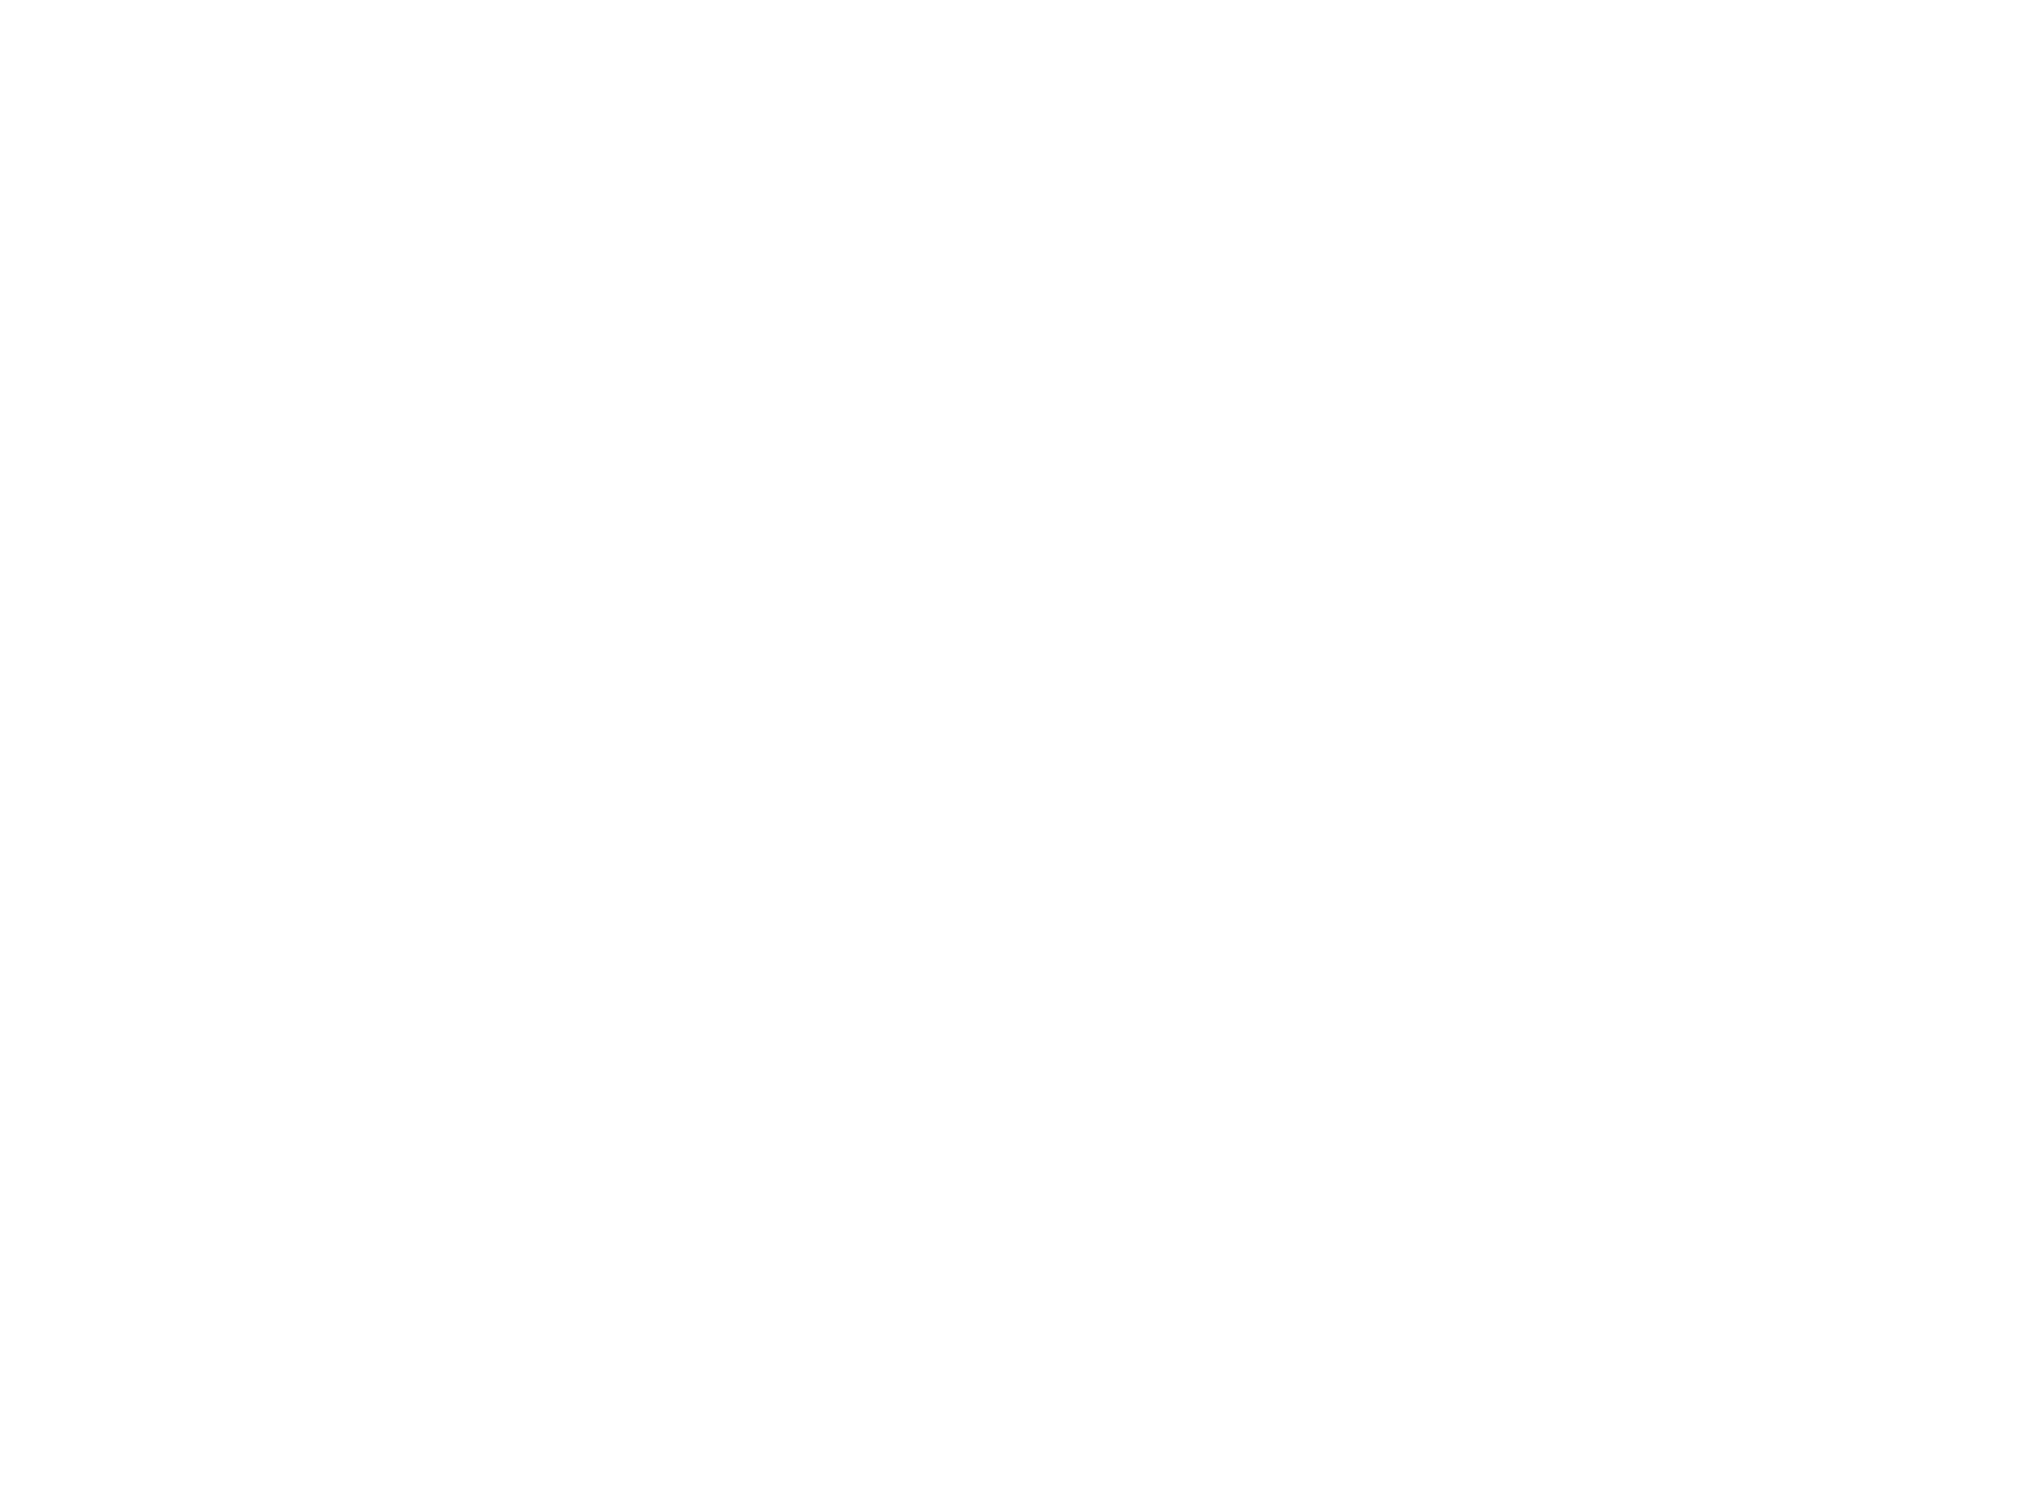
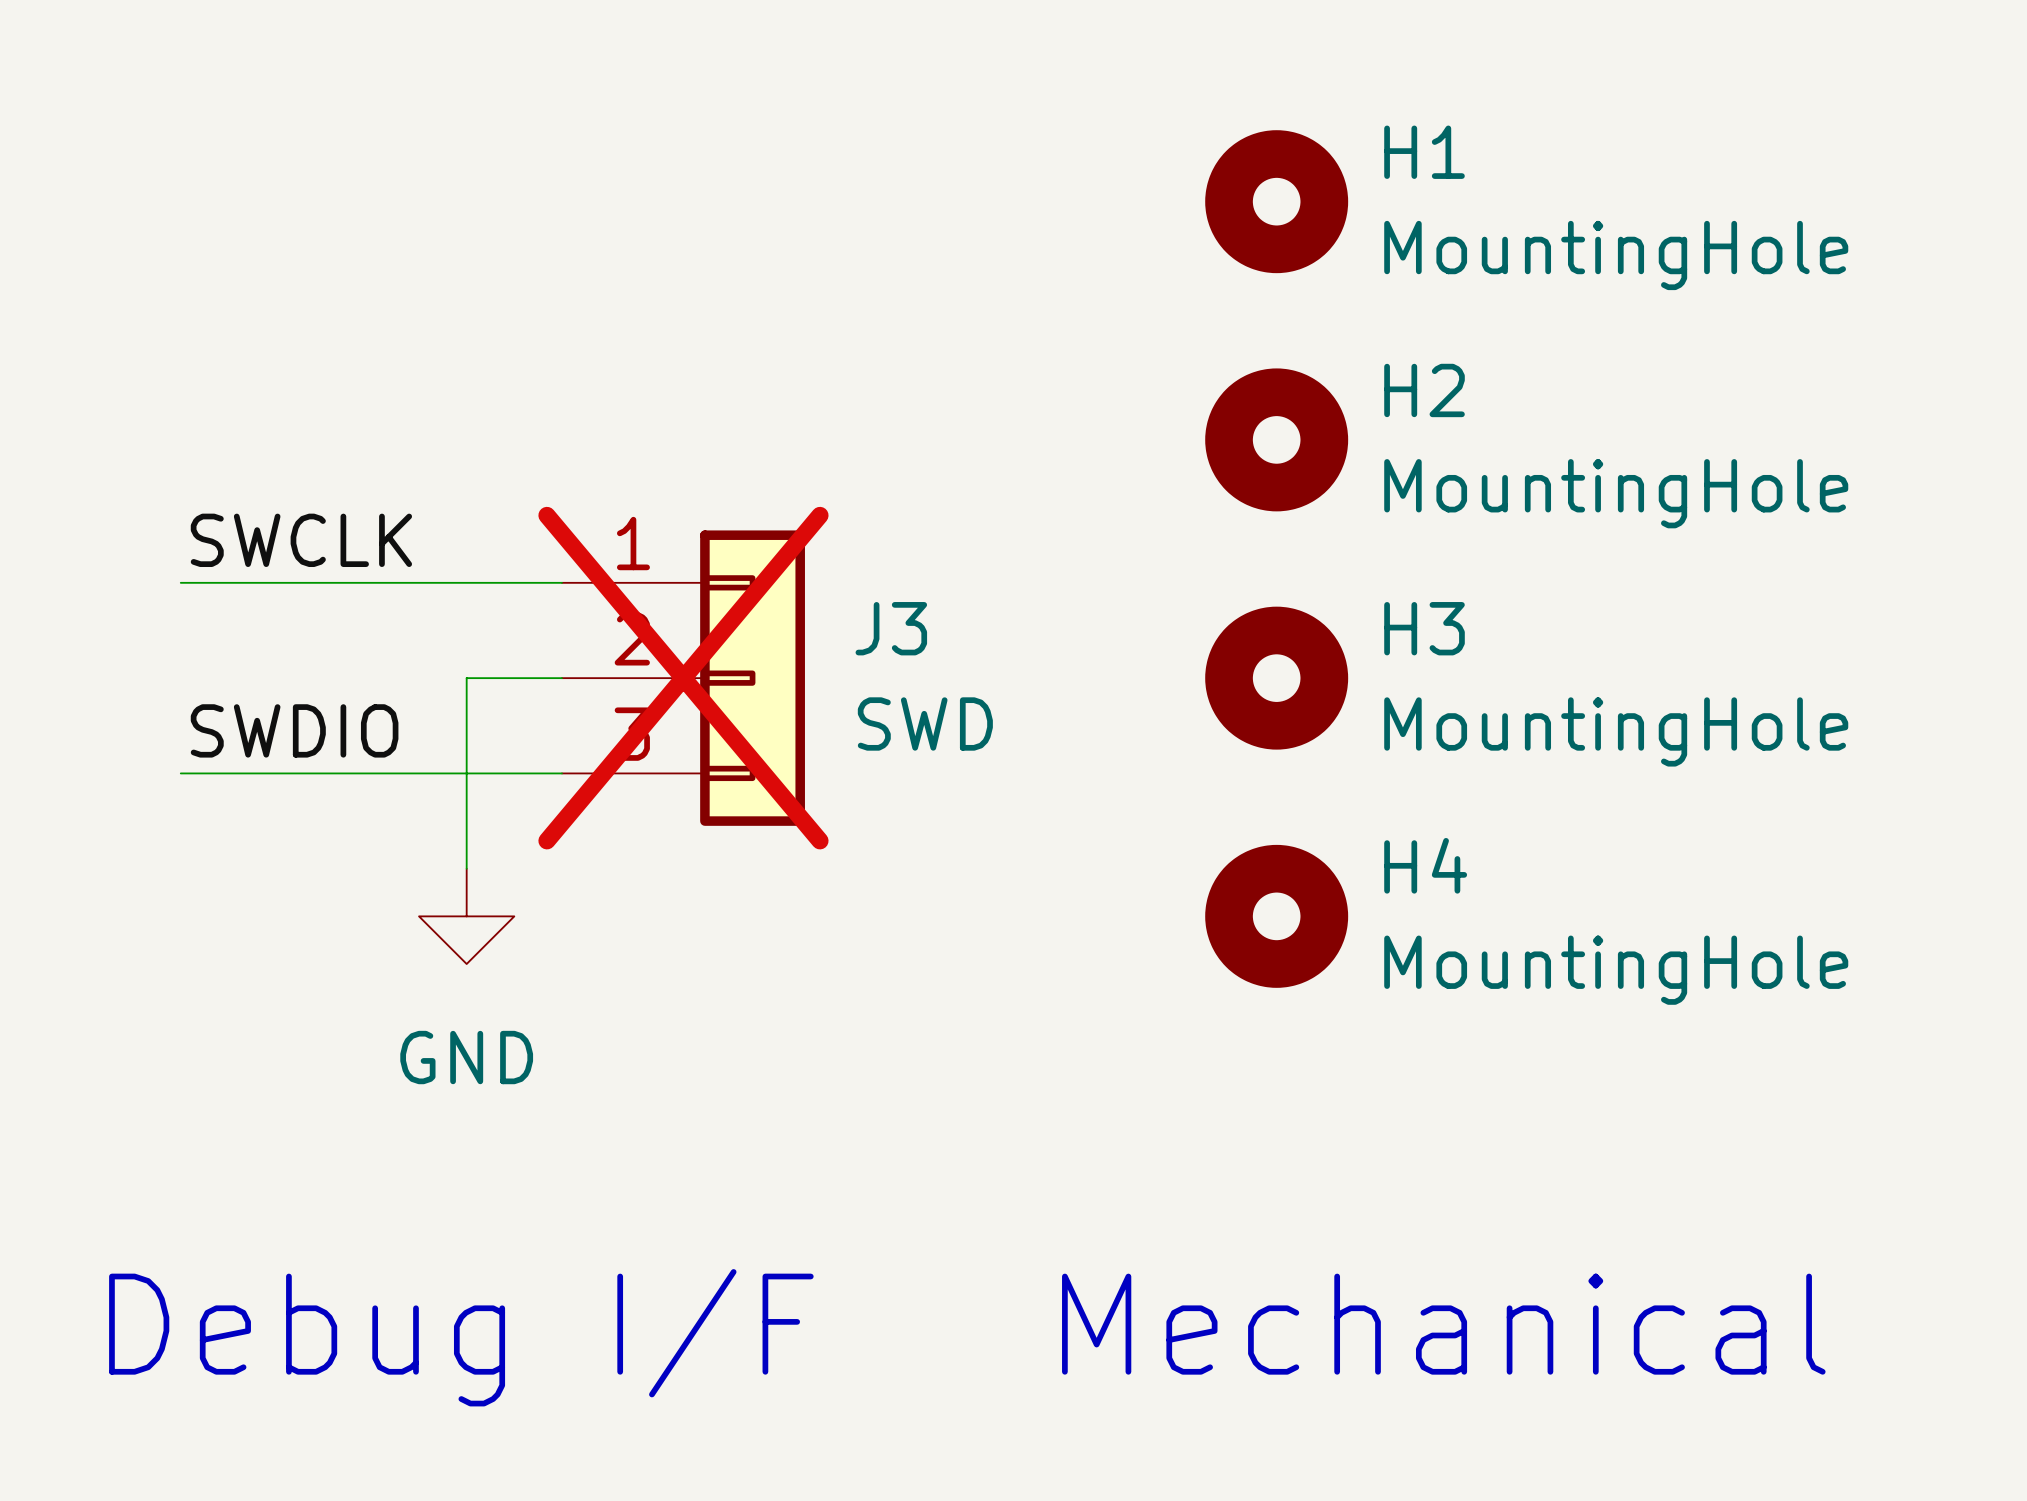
H1: none -> MountingHole (1276, 201)
H2: none -> MountingHole (1276, 439)
label: none -> SWCLK (301, 540)
wire: none -> (180, 582) (561, 582)
wire: none -> (561, 678) (466, 678) (466, 868)
J3: none -> SWD (683, 678)
H3: none -> MountingHole (1276, 678)
label: none -> SWDIO (294, 730)
wire: none -> (180, 773) (561, 773)
power symbol: none -> GND (466, 916)
H4: none -> MountingHole (1276, 916)
text: none -> Mechanical (1443, 1324)
text: none -> Debug I/F (461, 1337)

